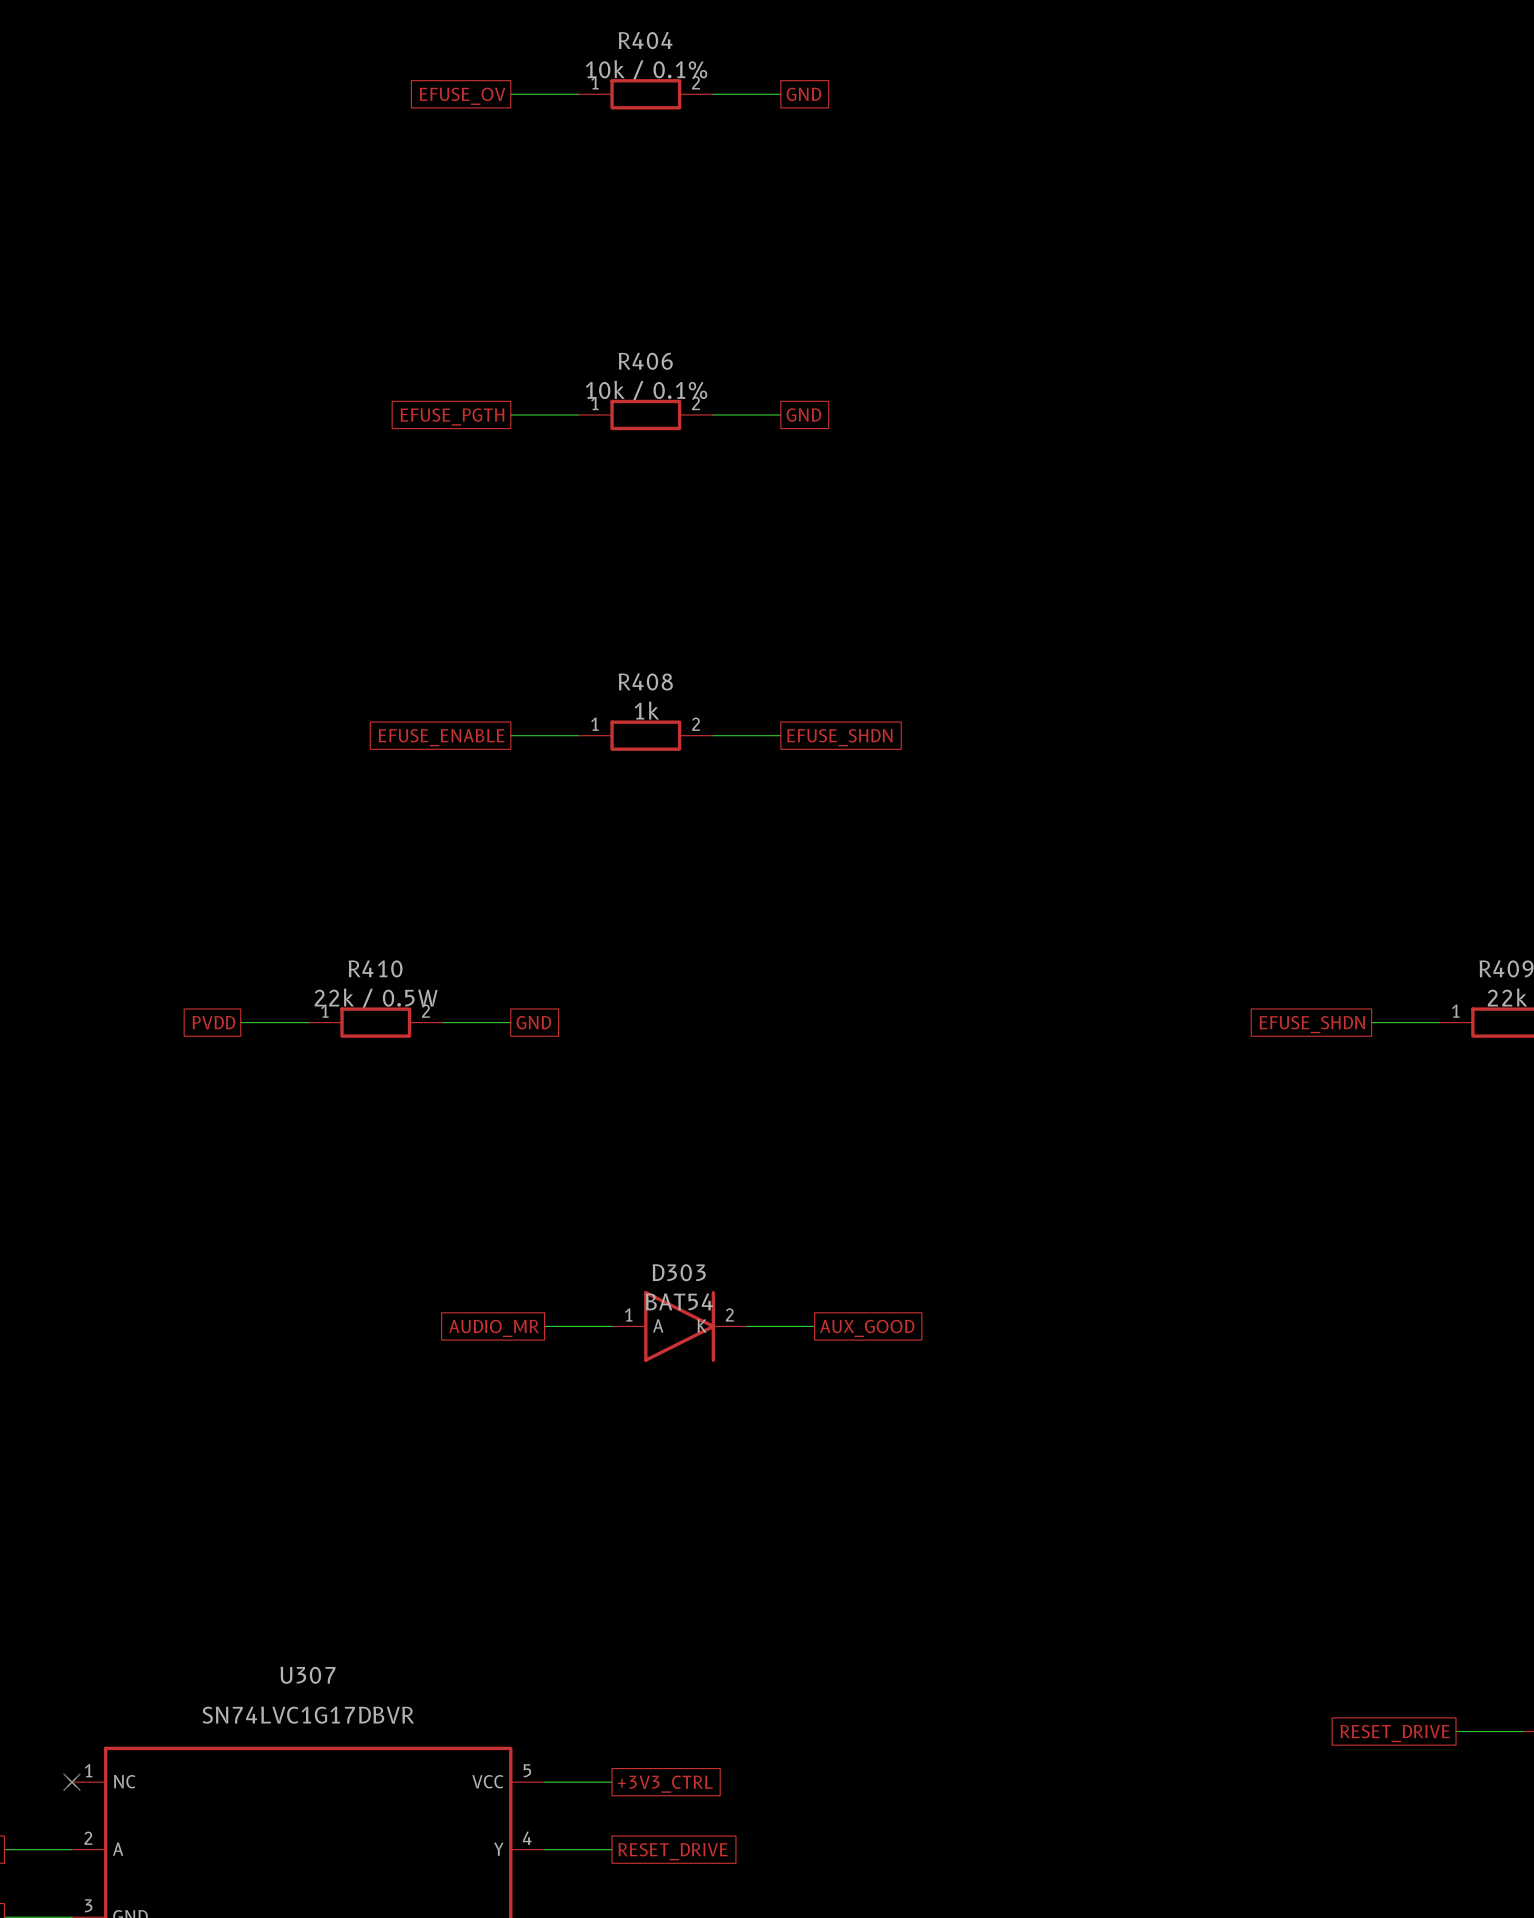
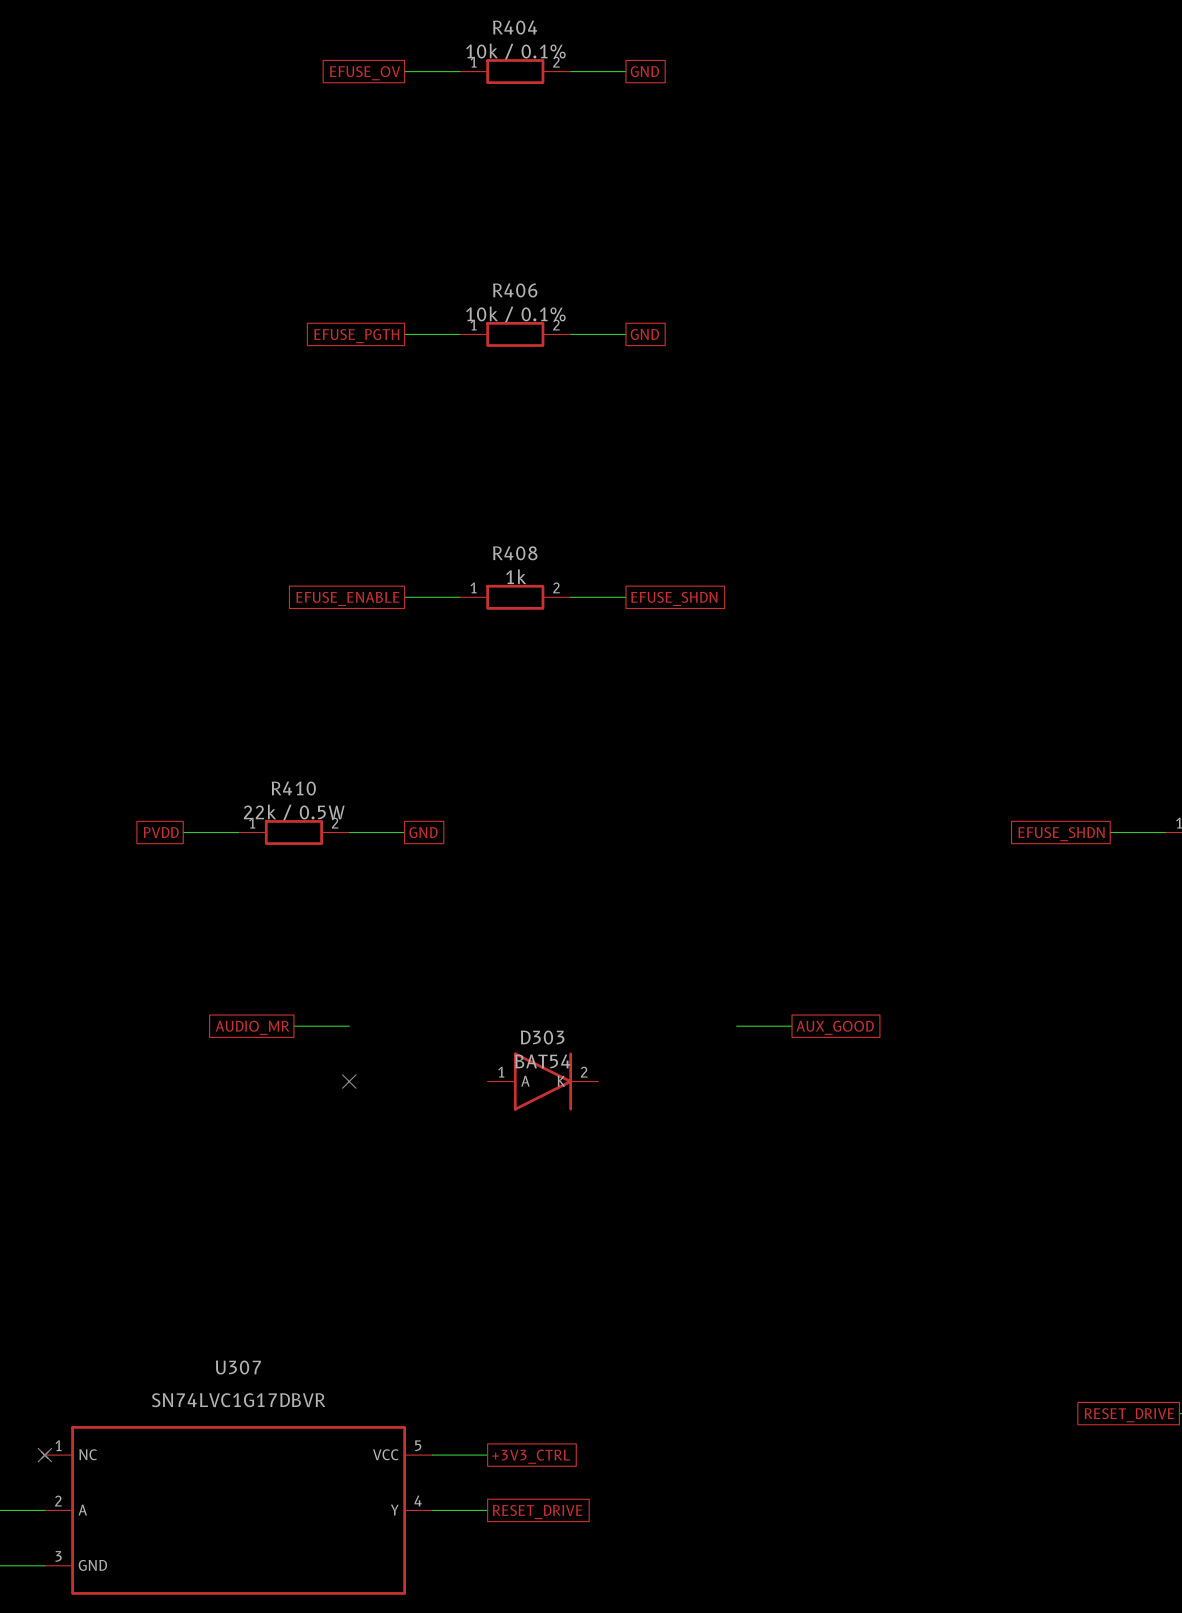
no-connect mark: none -> (349, 1081)
wire: (544, 1326) (612, 1326) -> (293, 1026) (349, 1026)
wire: (747, 1326) (814, 1326) -> (736, 1026) (792, 1026)
global label position: AUDIO_MR (494, 1328) -> AUDIO_MR (252, 1027)
global label position: AUX_GOOD (867, 1328) -> AUX_GOOD (835, 1027)

